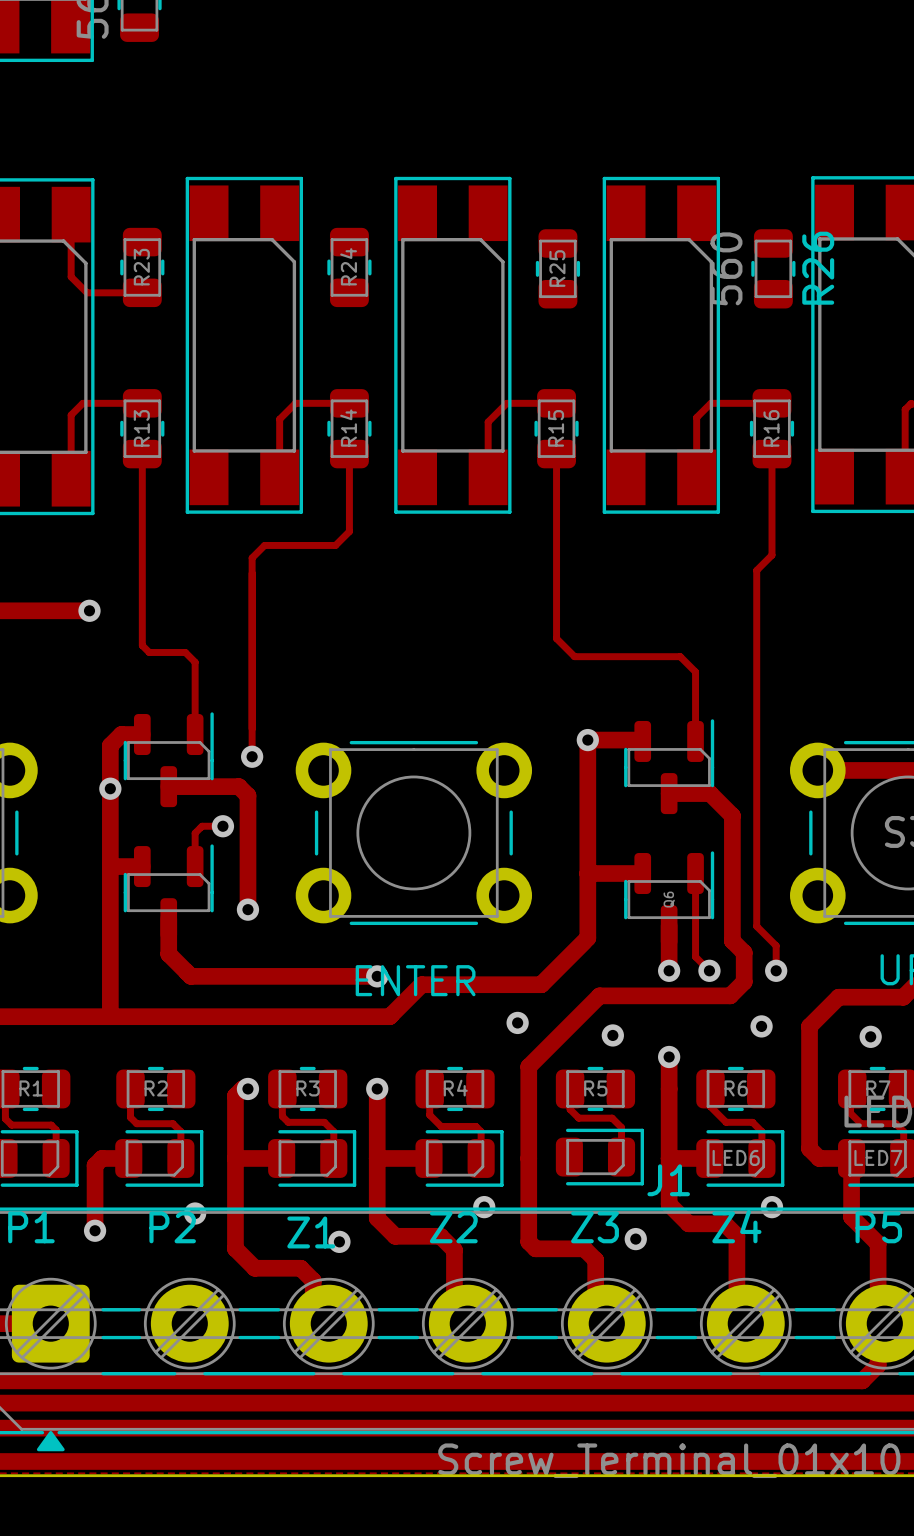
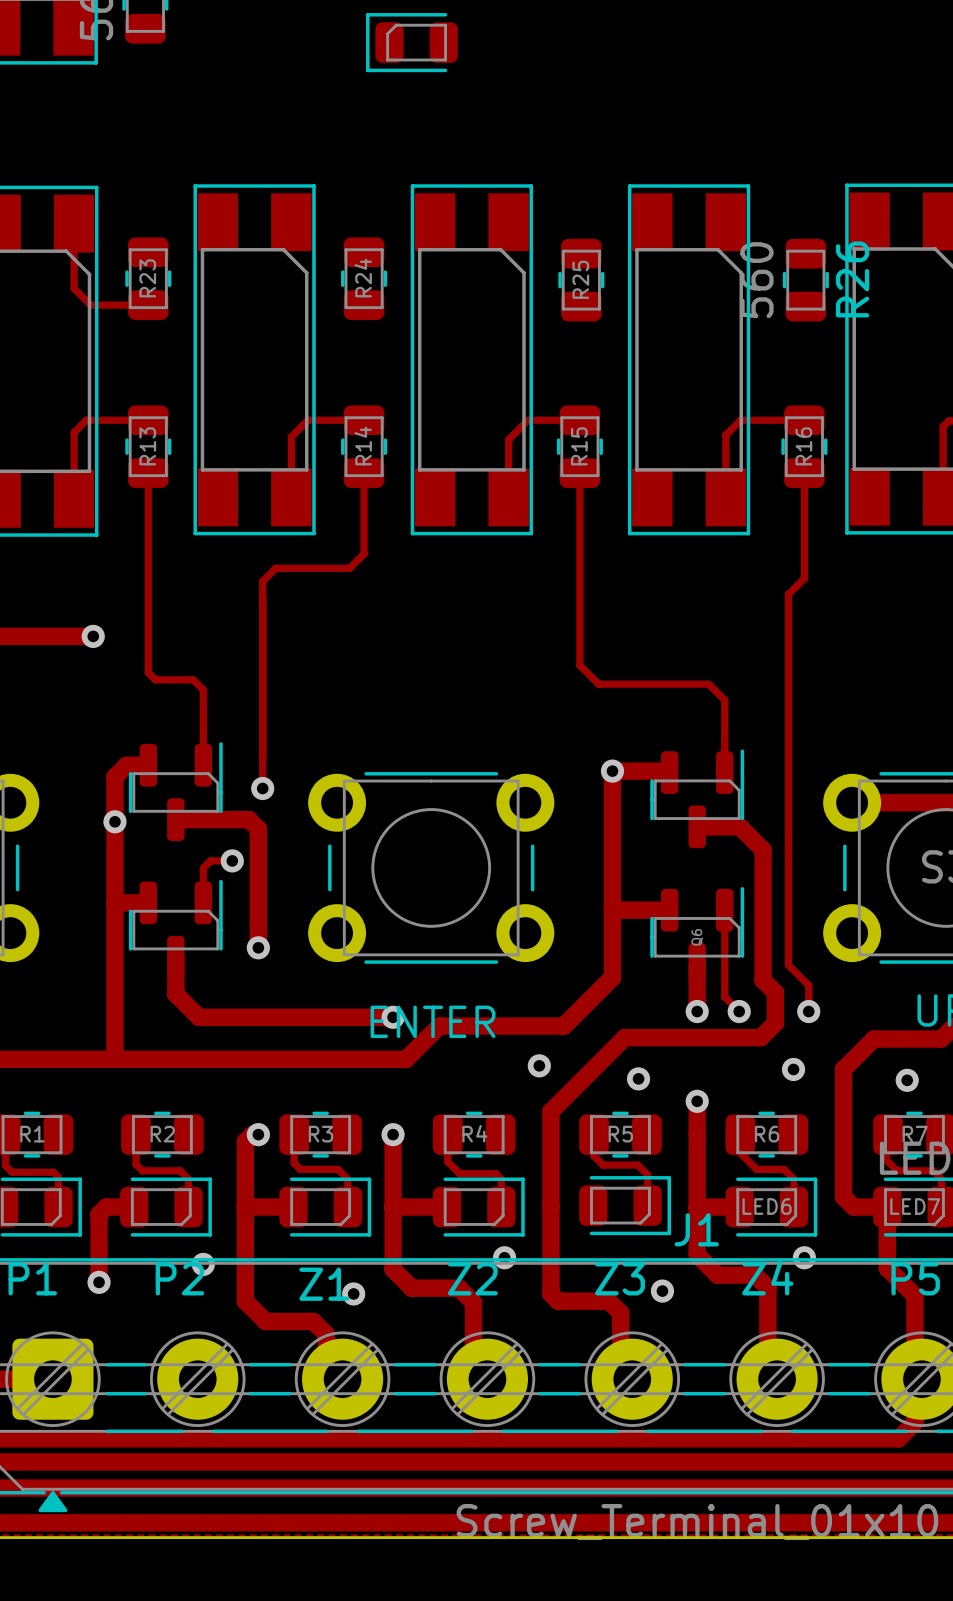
part: none -> (411, 42)

